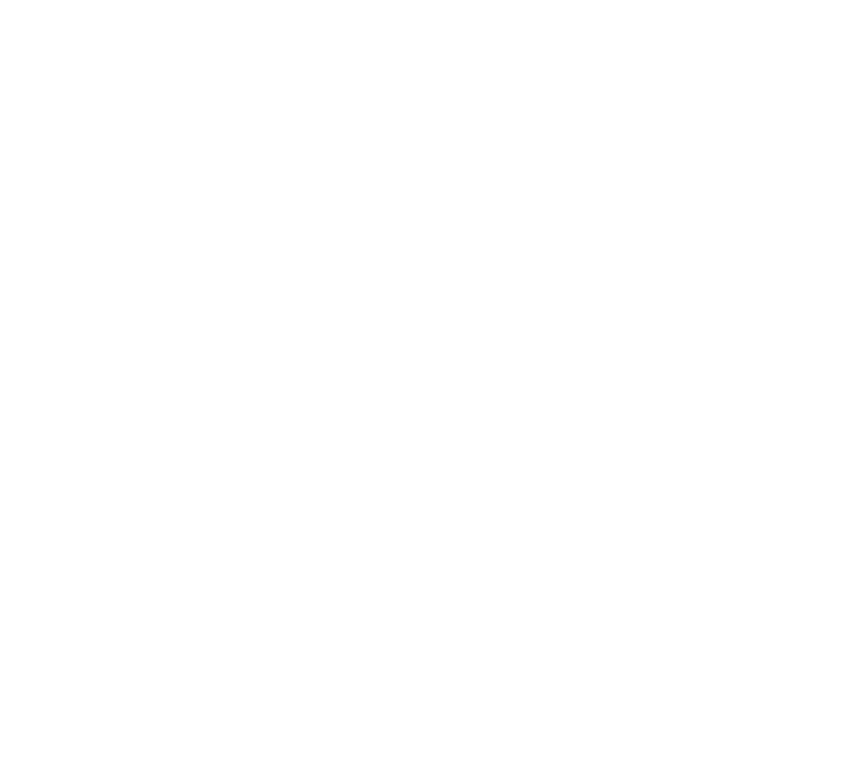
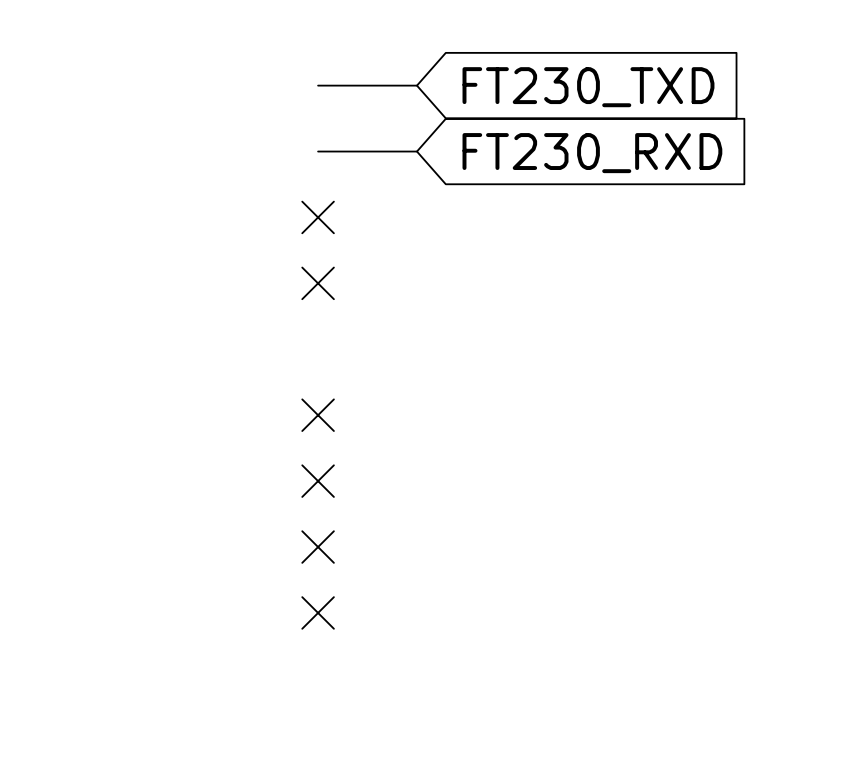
wire: none -> (318, 85) (416, 85)
global label: none -> FT230_TXD (588, 87)
wire: none -> (318, 151) (416, 151)
global label: none -> FT230_RXD (592, 153)
no-connect mark: none -> (318, 217)
no-connect mark: none -> (318, 283)
no-connect mark: none -> (318, 415)
no-connect mark: none -> (318, 481)
no-connect mark: none -> (318, 547)
no-connect mark: none -> (318, 612)

